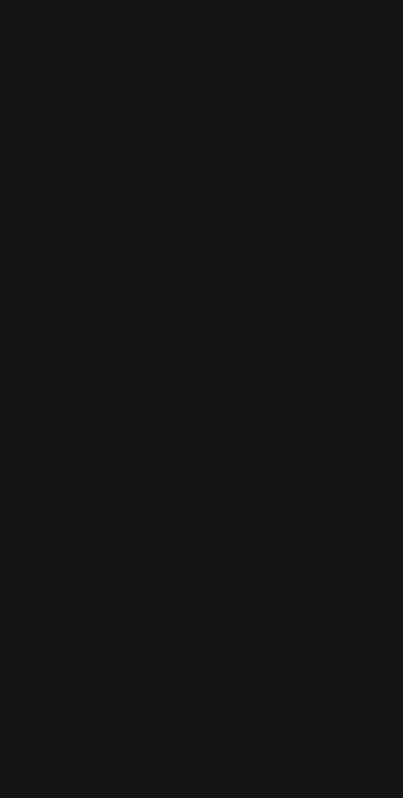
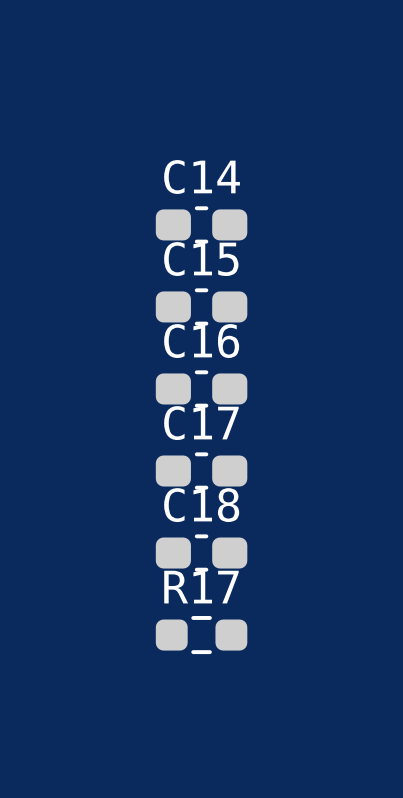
C14: none -> (201, 224)
C15: none -> (201, 306)
C16: none -> (201, 388)
C17: none -> (201, 471)
C18: none -> (201, 553)
R17: none -> (201, 635)

